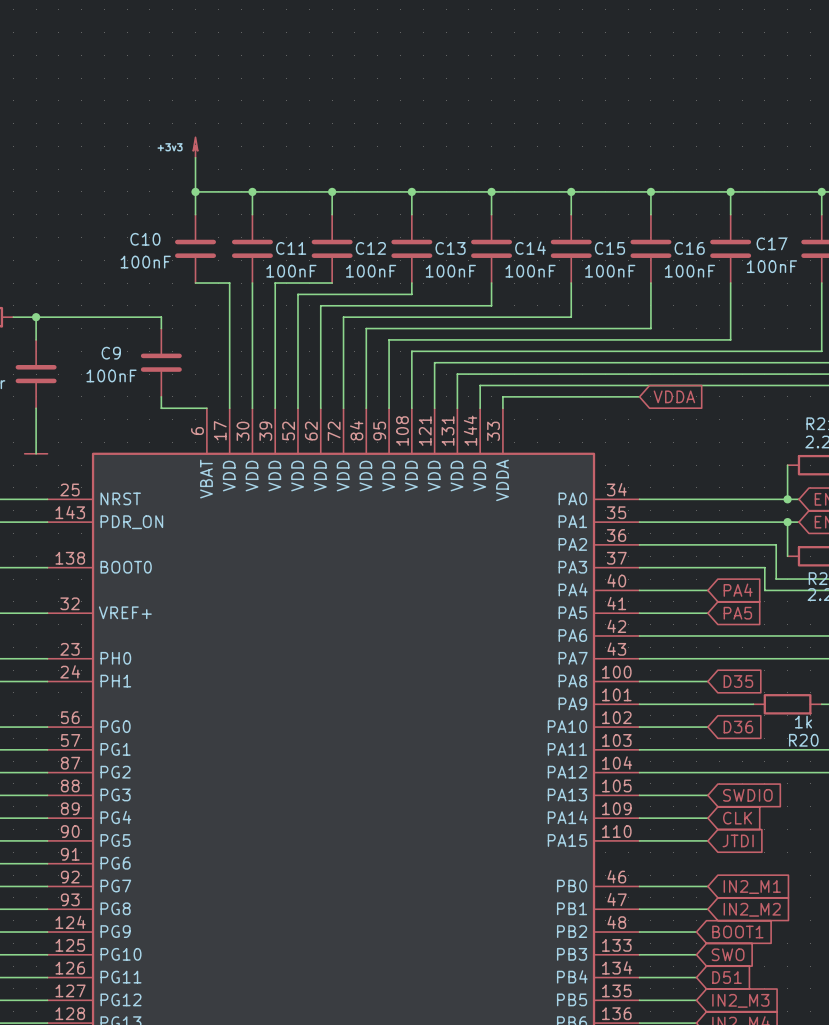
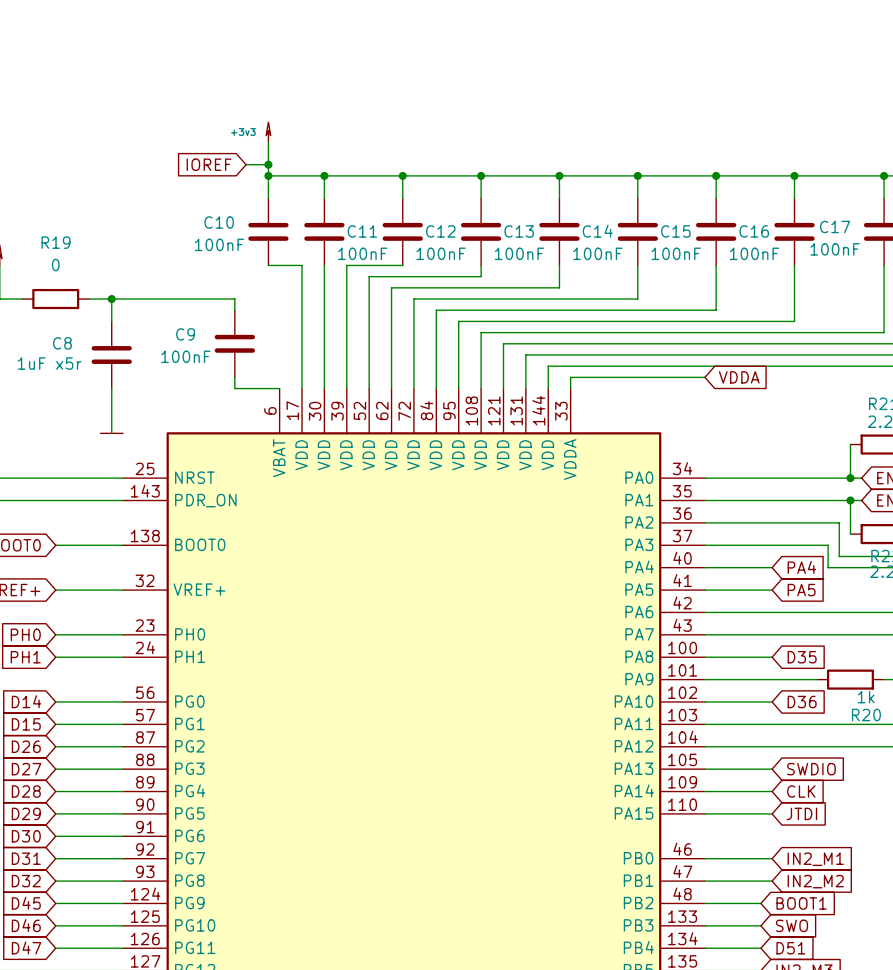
global label: none -> IOREF (209, 164)
wire: none -> (246, 164) (268, 164)
junction: none -> (268, 164)

